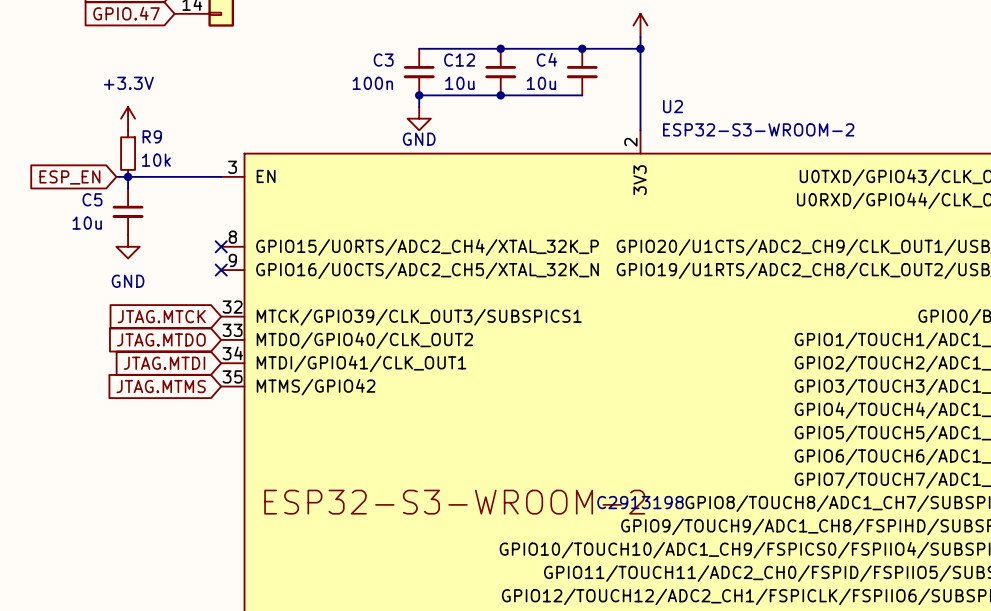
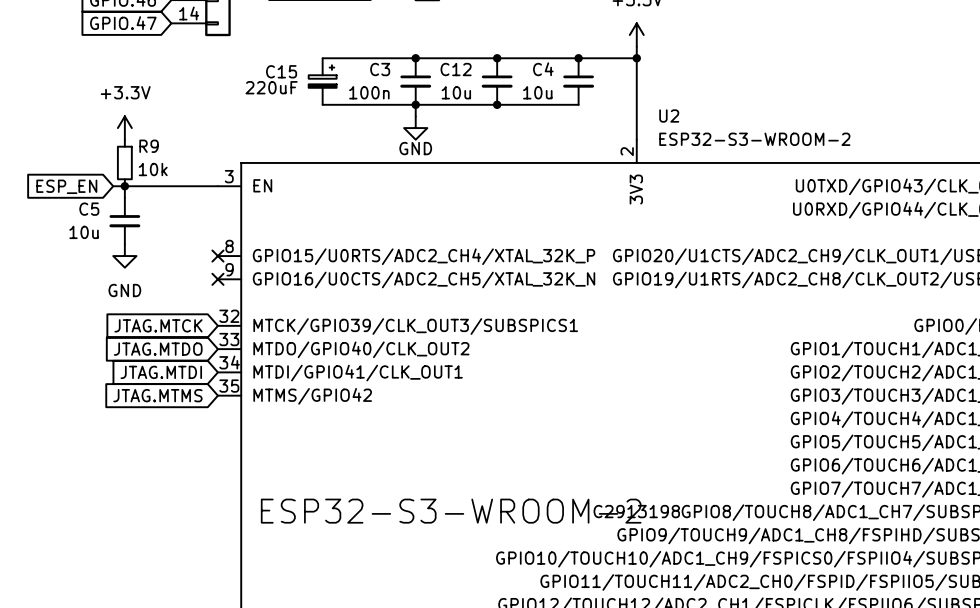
wire: none -> (322, 58) (415, 58)
junction: none -> (415, 58)
C15: none -> 220uF (322, 81)
wire: none -> (322, 104) (415, 104)

